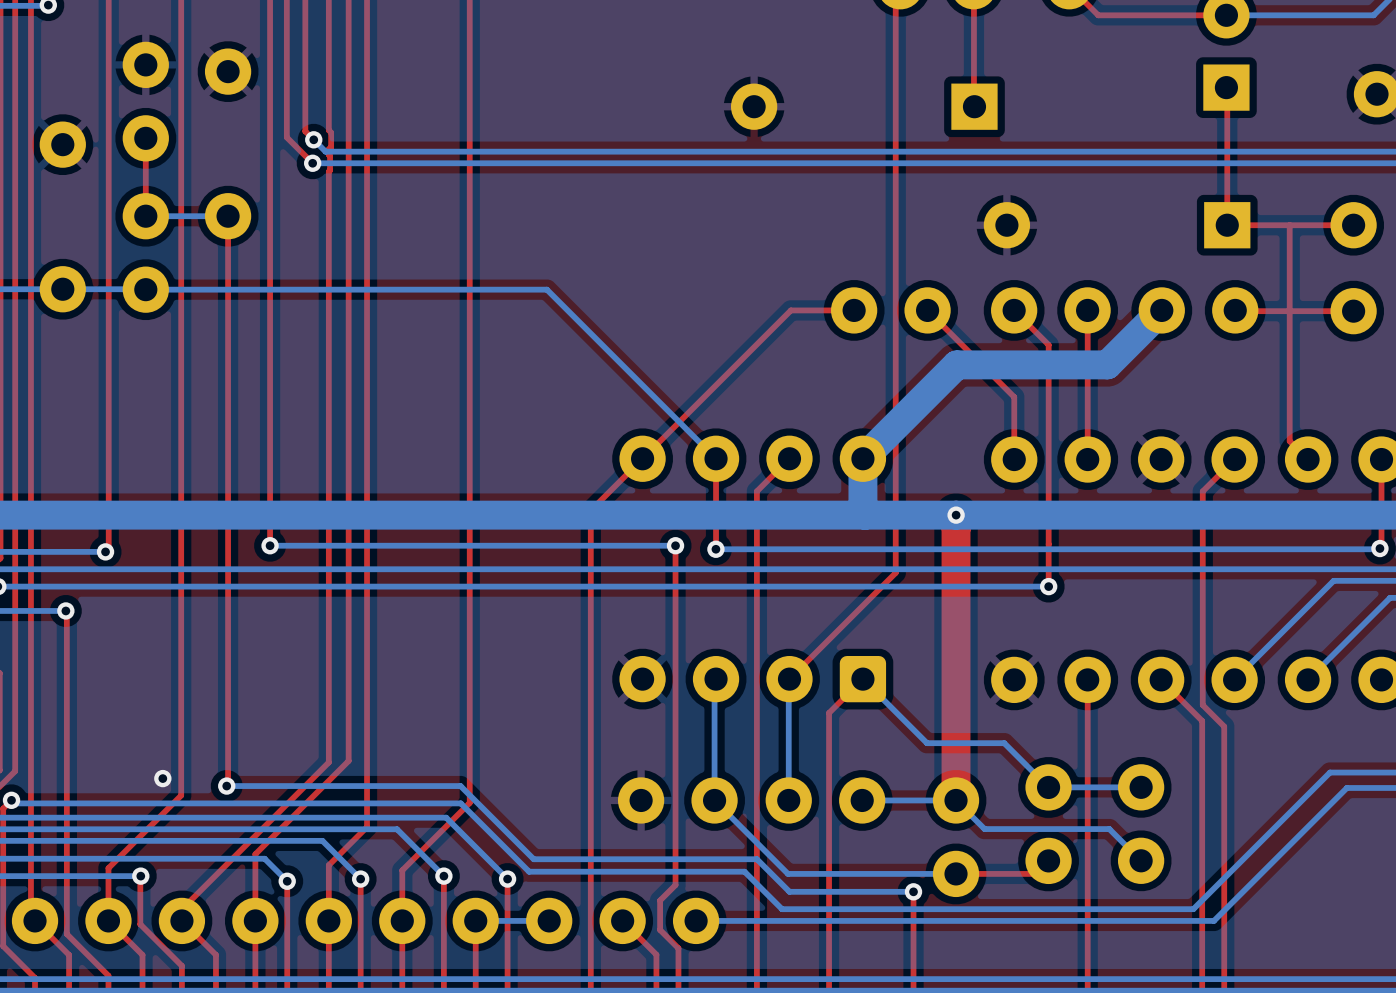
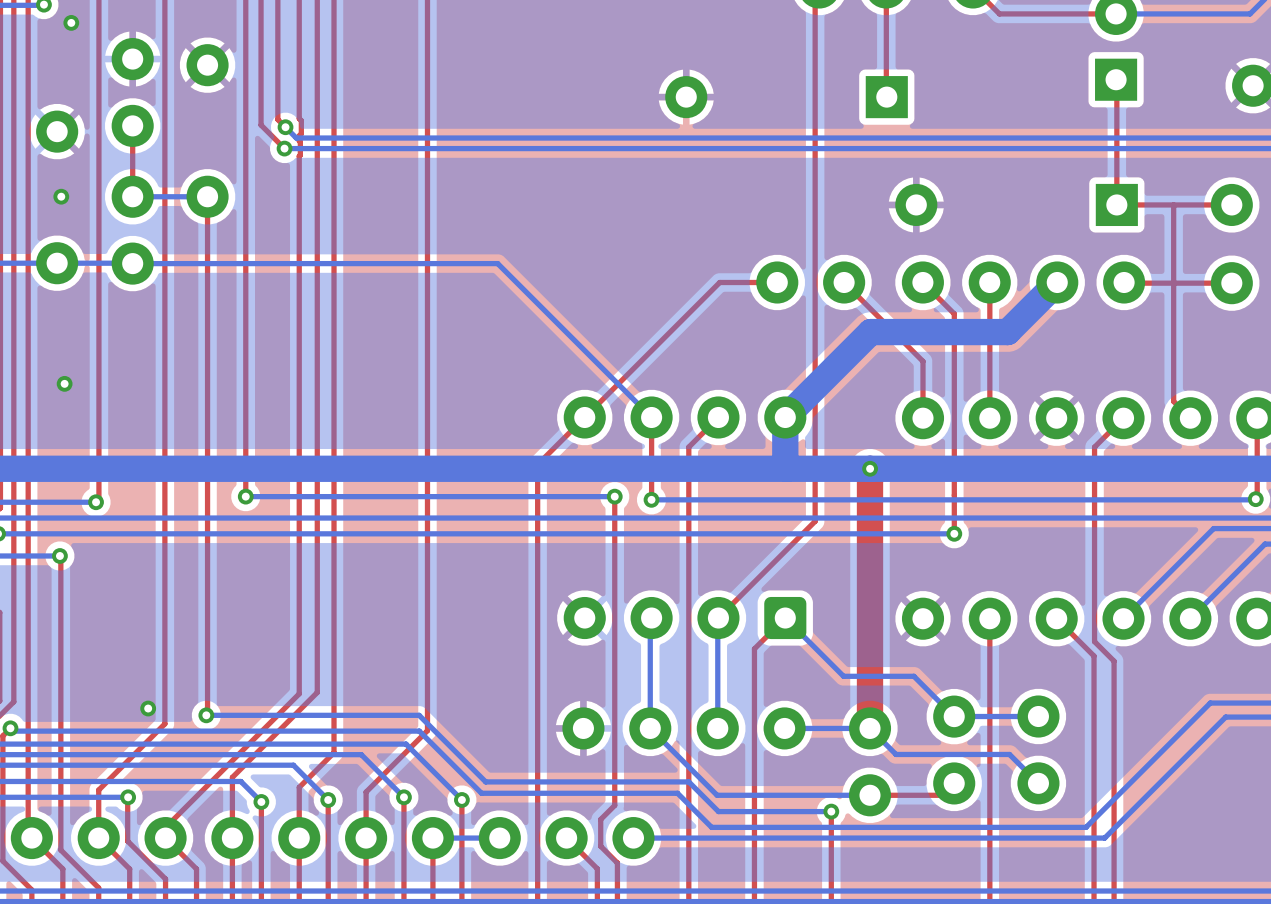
via: none -> (71, 22)
via: none -> (61, 196)
via: none -> (64, 383)

